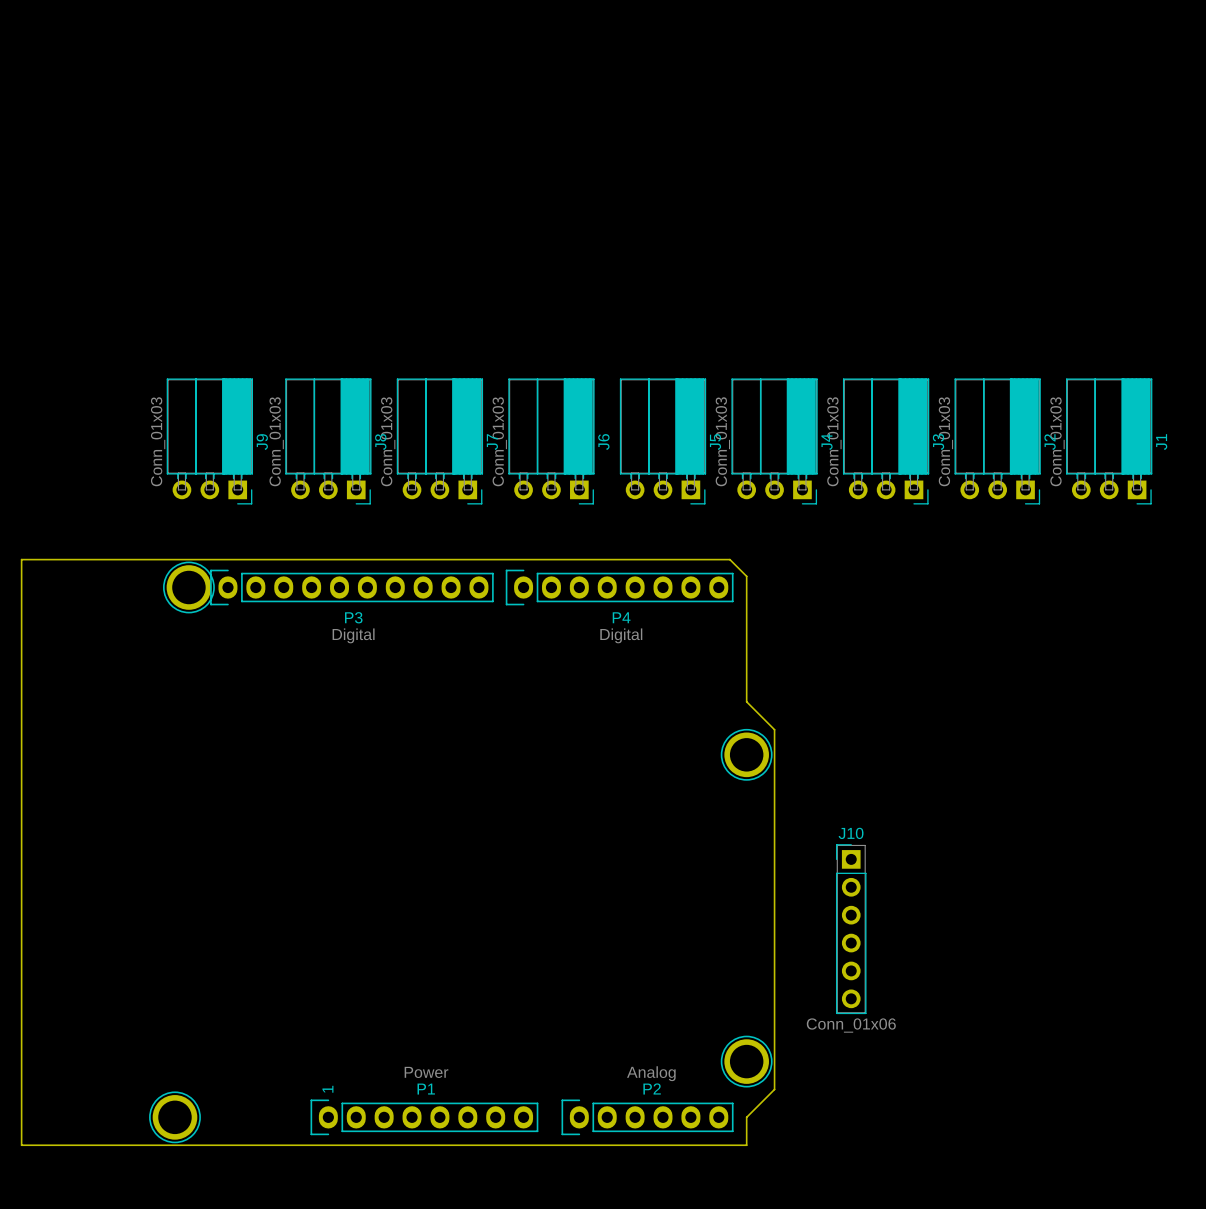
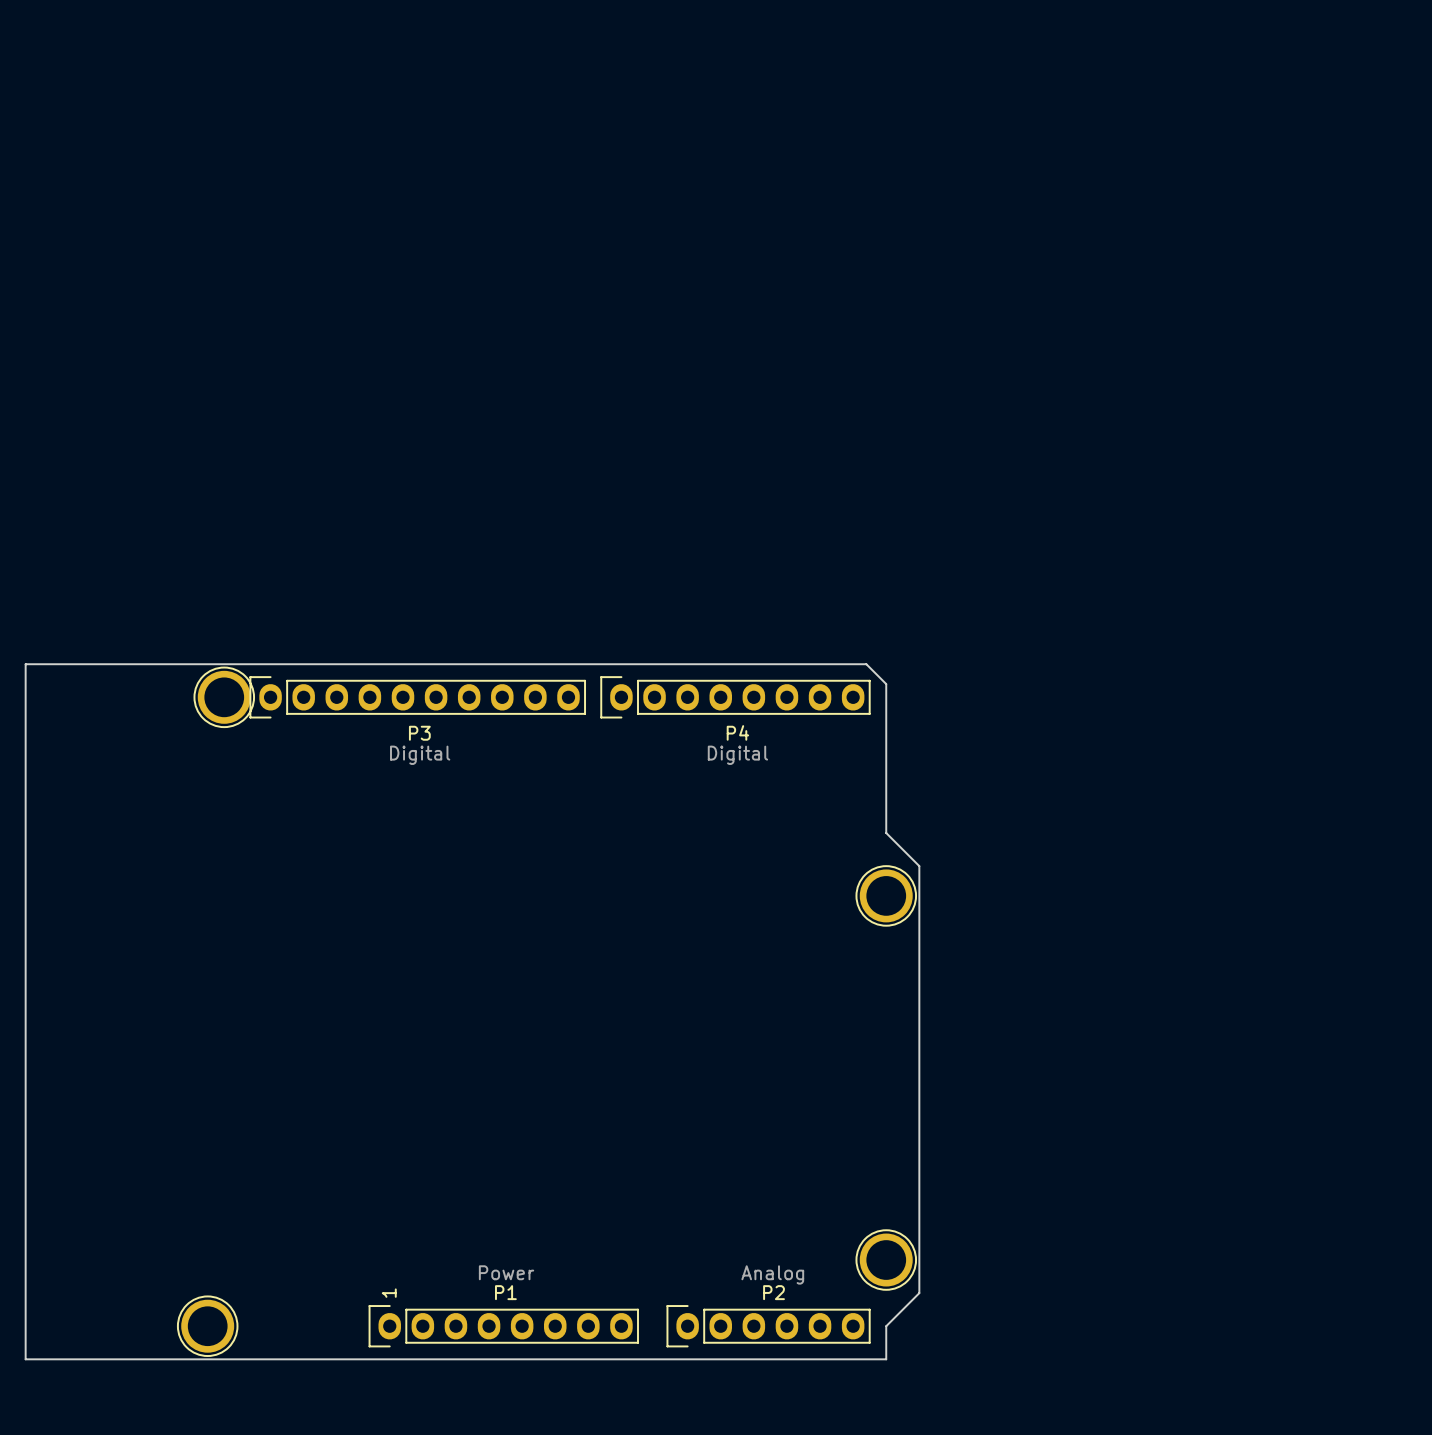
J9: Conn_01x03 (209, 441) -> none
J8: Conn_01x03 (328, 441) -> none
J7: Conn_01x03 (439, 441) -> none
J6: Conn_01x03 (551, 441) -> none
J5: (663, 441) -> none
J4: Conn_01x03 (774, 441) -> none
J3: Conn_01x03 (886, 441) -> none
J2: Conn_01x03 (997, 441) -> none
J1: Conn_01x03 (1109, 441) -> none
J10: Conn_01x06 (851, 929) -> none

